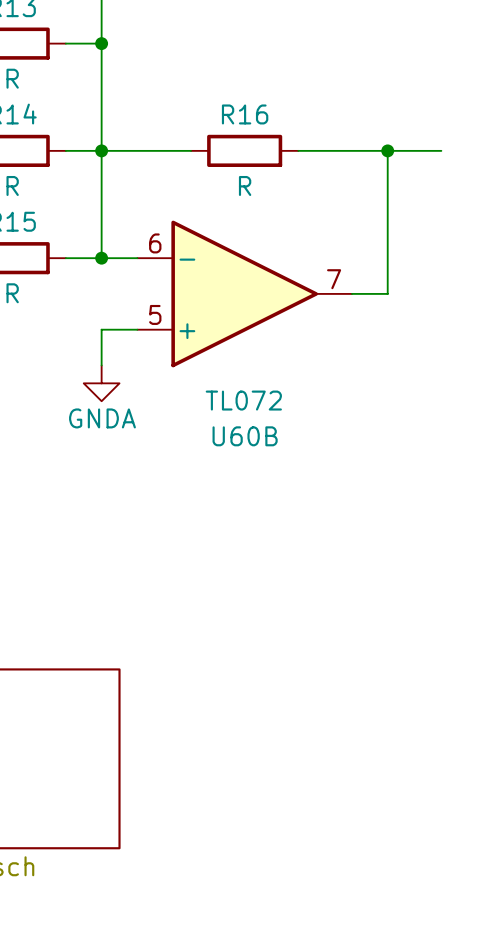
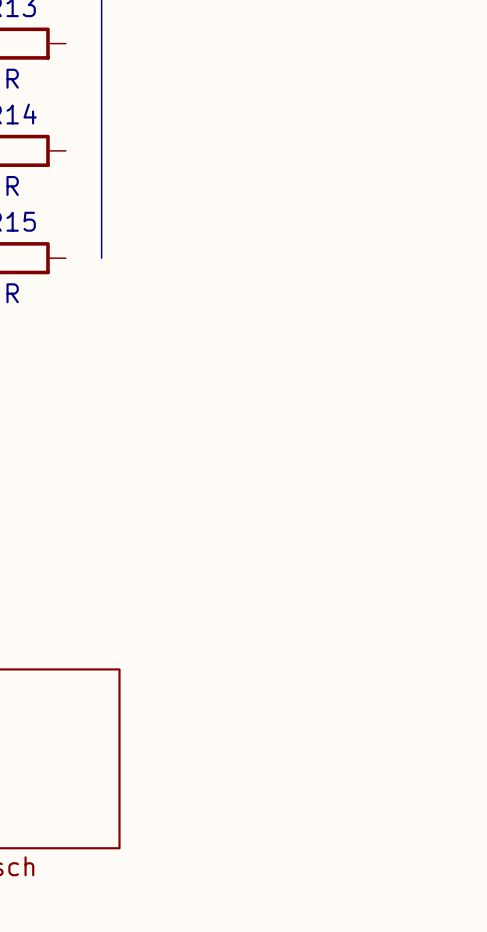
wire: (65, 43) (101, 43) -> none
junction: (101, 43) -> none
wire: (65, 150) (191, 150) -> none
junction: (101, 150) -> none
R16: R (244, 150) -> none
wire: (298, 150) (441, 150) -> none
wire: (387, 150) (387, 293) (351, 293) -> none
junction: (387, 150) -> none
wire: (65, 258) (137, 258) -> none
junction: (101, 258) -> none
U60B: TL072 (244, 293) -> none
wire: (137, 329) (101, 329) (101, 365) -> none
power symbol: GNDA (101, 383) -> none

